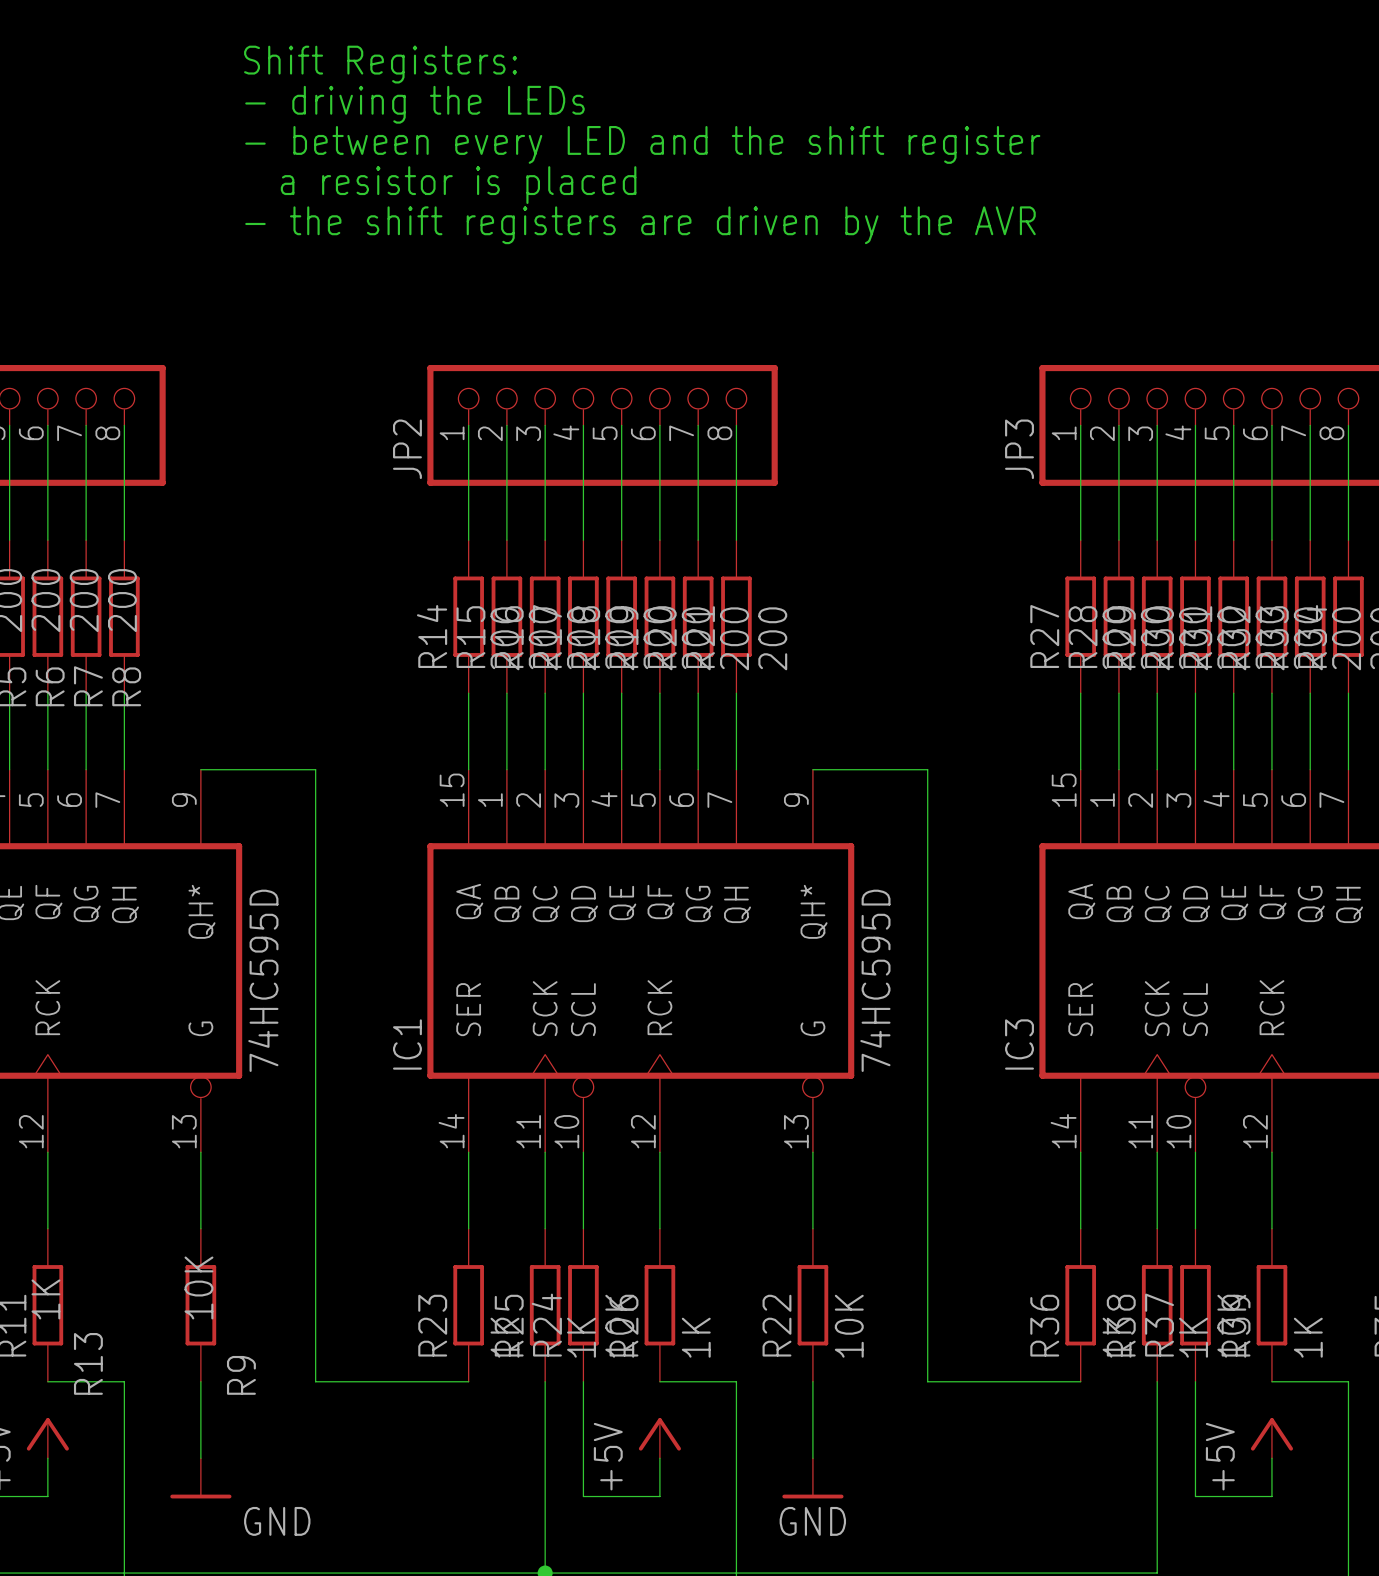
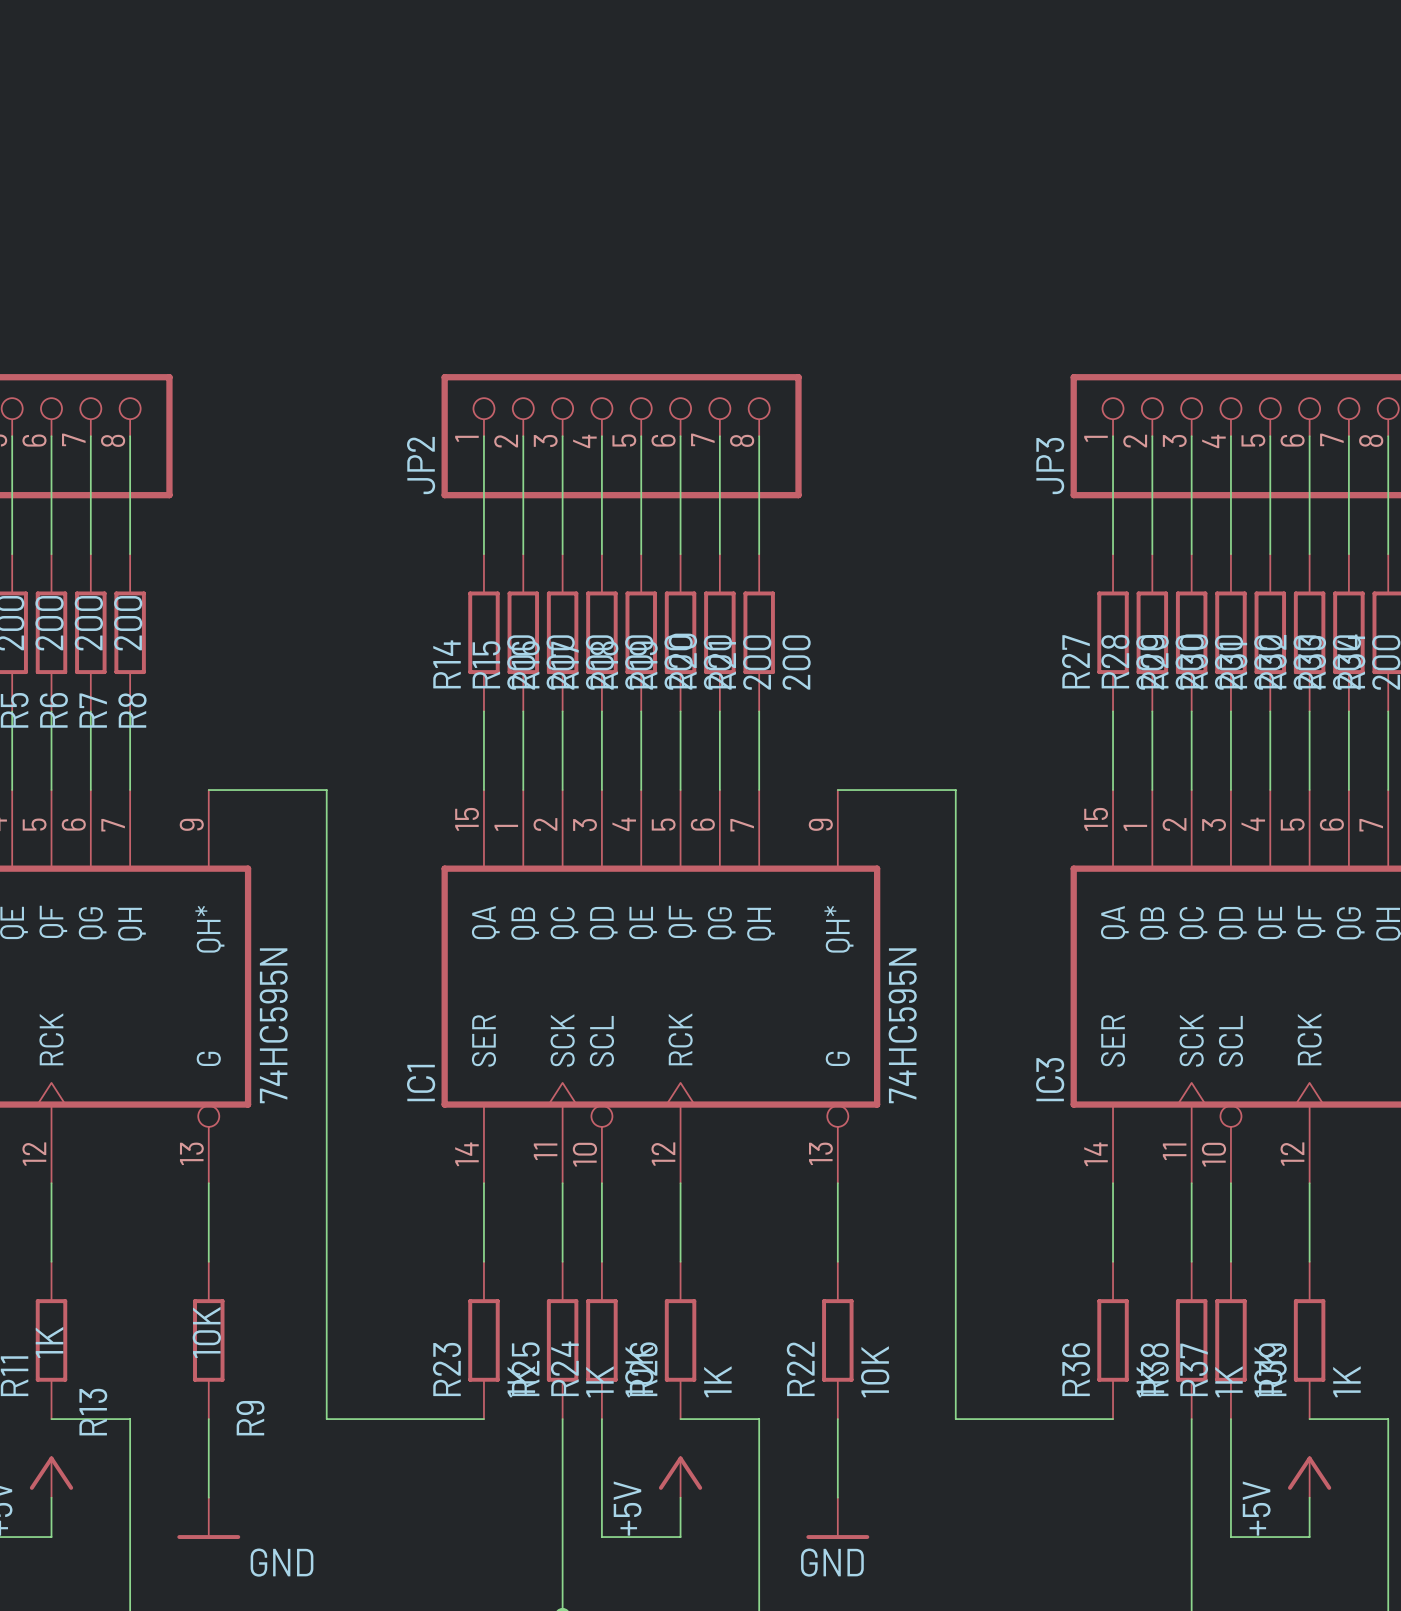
text: Shift Registers: (380, 64) -> none
text: - driving the LEDs (414, 104) -> none
text: - between every LED and the shift register (642, 144) -> none
text: a resistor is placed (458, 185) -> none
text: - the shift registers are driven by the AVR (640, 225) -> none
part value: 74HC595D (263, 980) -> 74HC595N (273, 1025)
IC1 value: 74HC595D (875, 980) -> 74HC595N (902, 1025)

